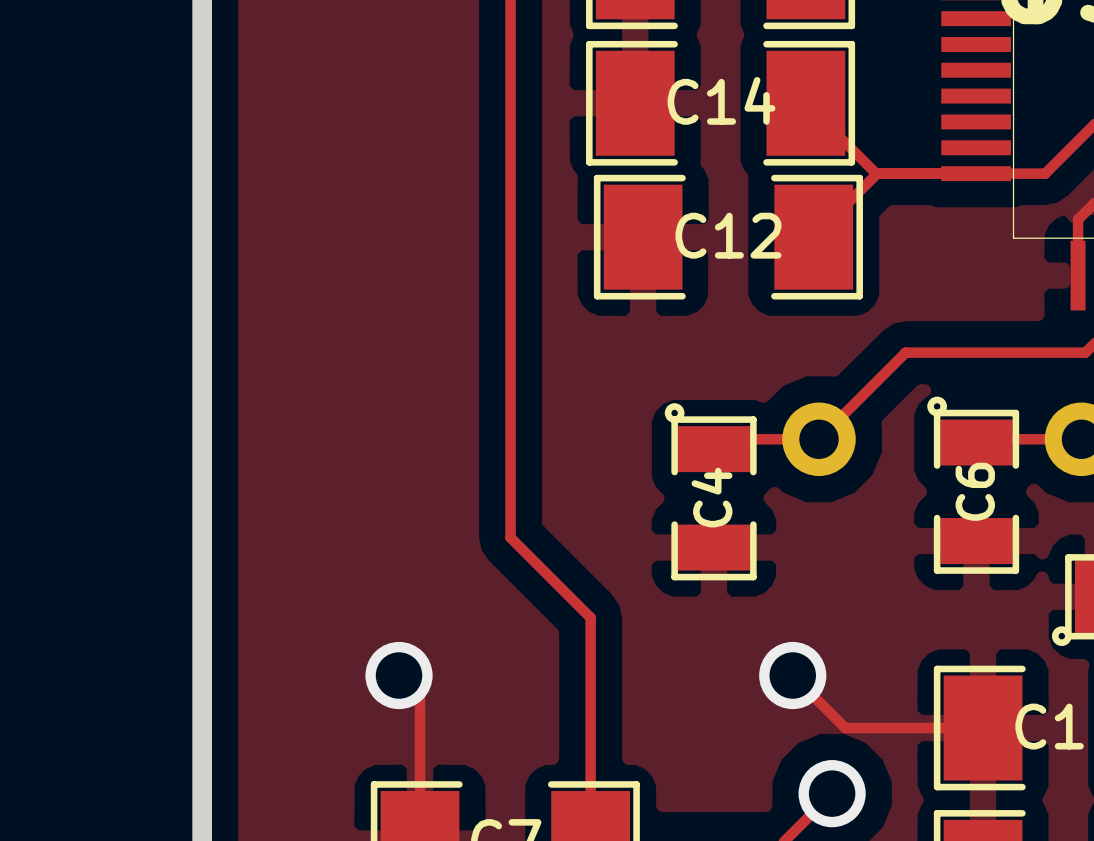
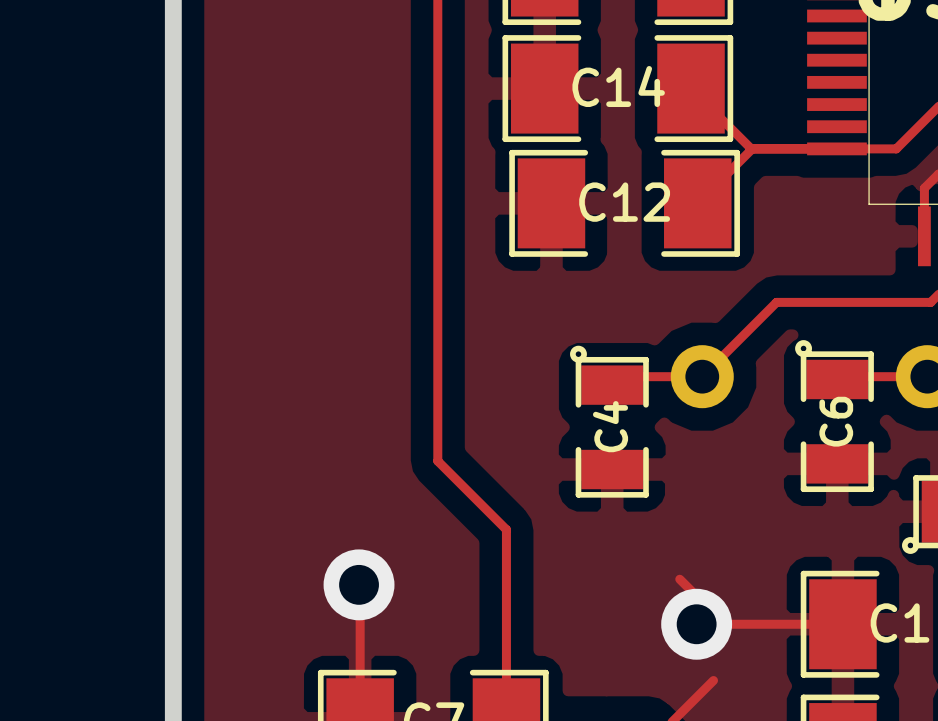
via size: [365, 641, 433, 710] -> [323, 549, 395, 621]
via: (792, 675) -> none
via: none -> (696, 624)
via: (832, 793) -> none

